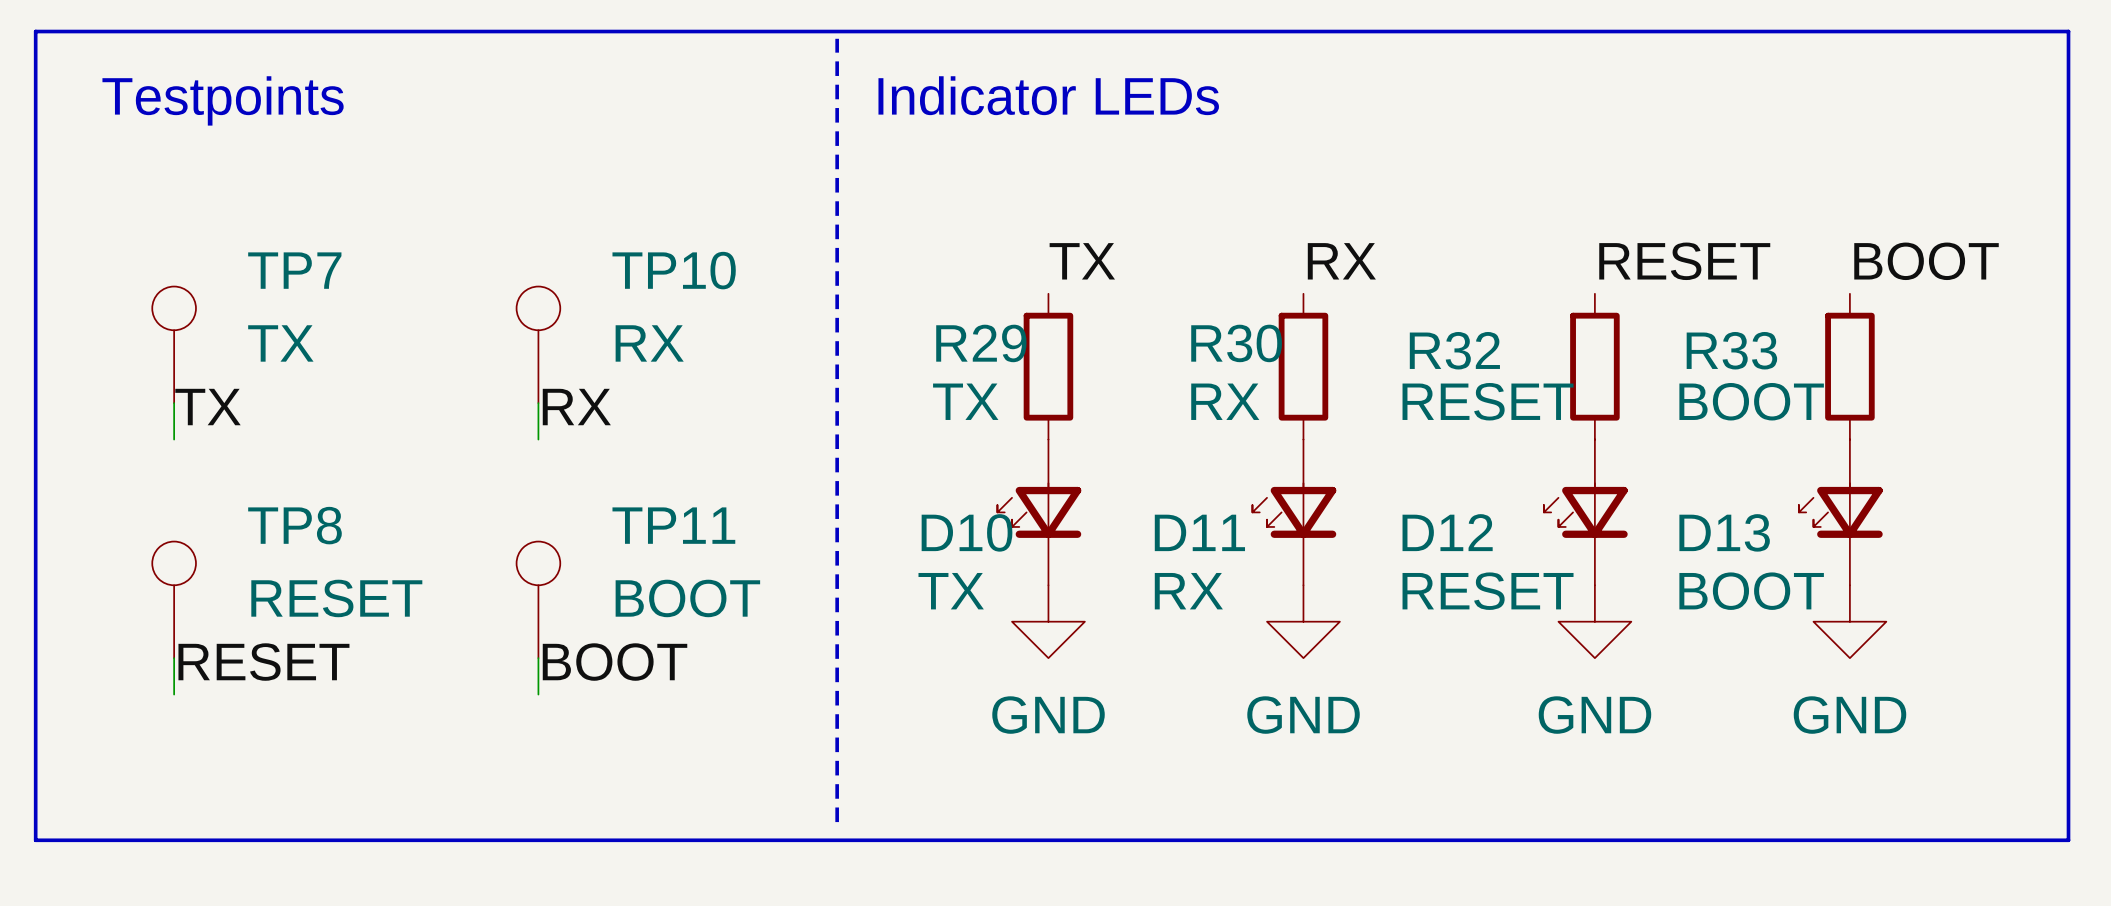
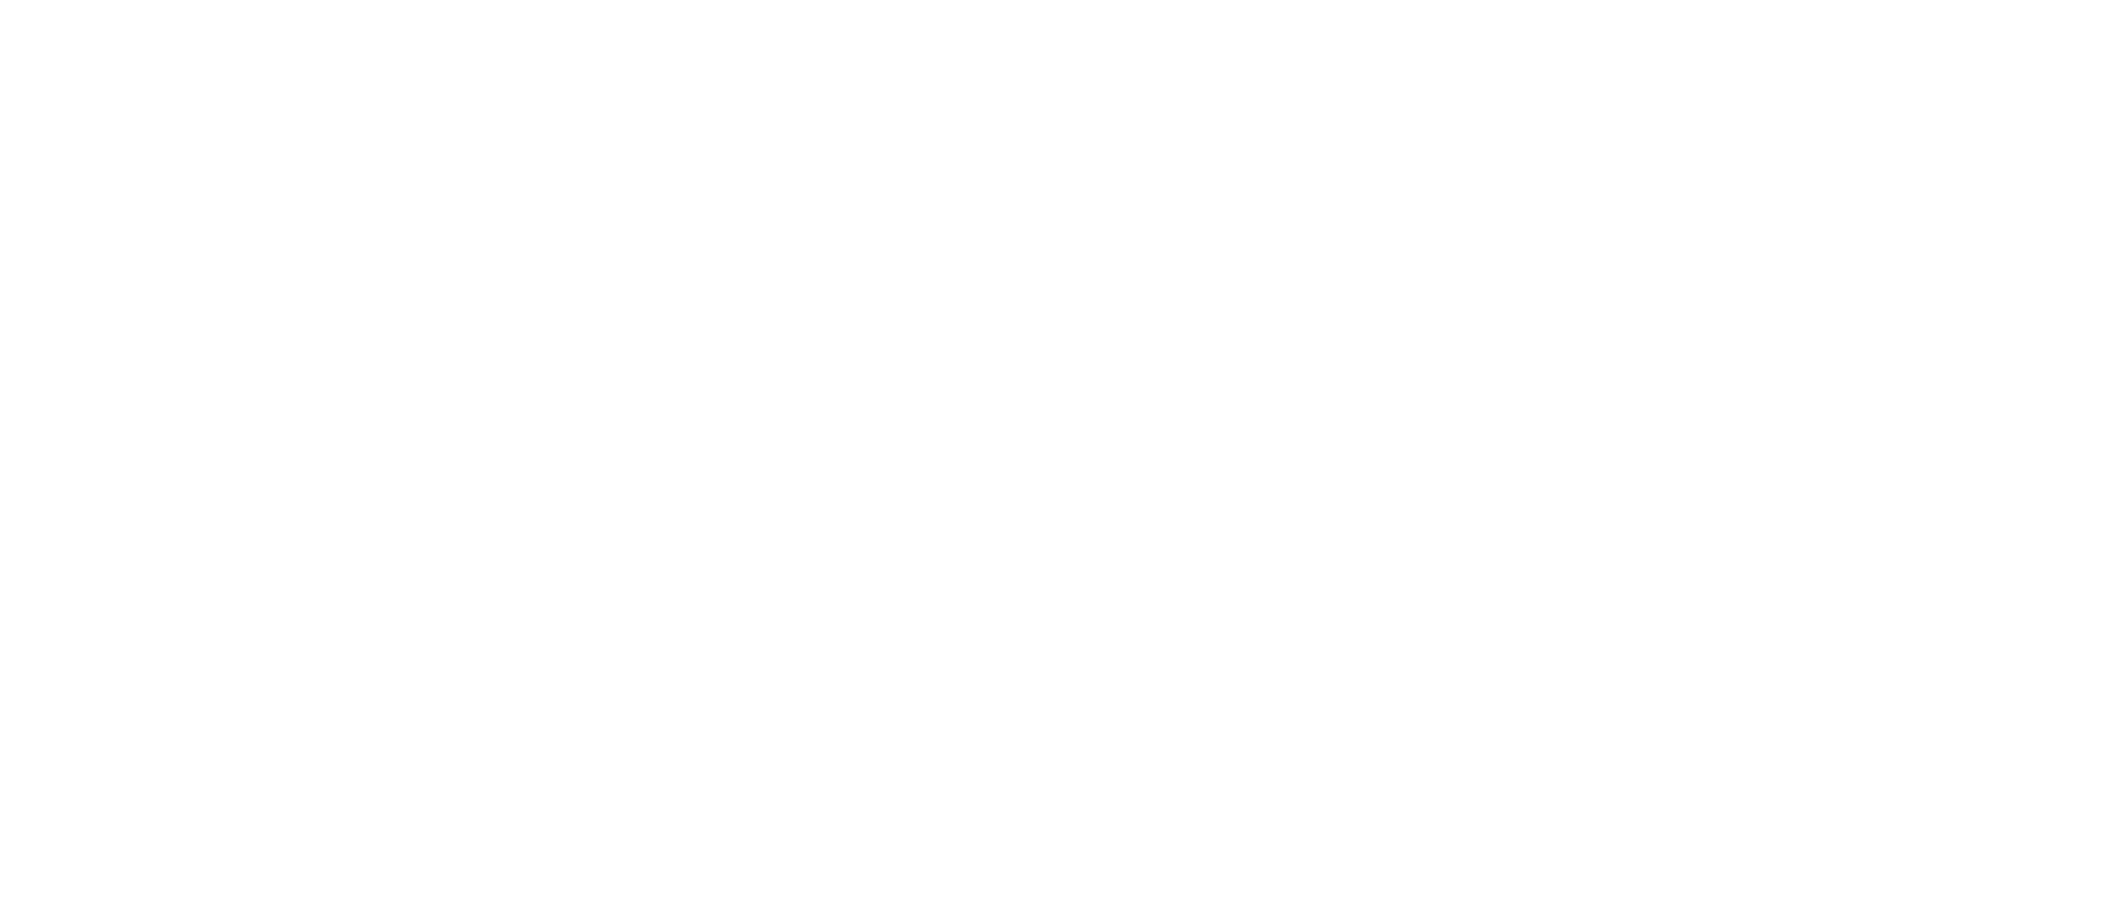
line: (35, 31) (2068, 31) (2068, 840) (35, 840) (35, 31) -> none
line: (837, 38) (837, 822) -> none
text: Indicator LEDs (1048, 95) -> none
text: Testpoints (223, 100) -> none
label: TX (1082, 261) -> none
label: RX (1341, 261) -> none
label: RESET (1684, 261) -> none
label: BOOT (1926, 261) -> none
TP7: TX (174, 344) -> none
TP10: RX (538, 344) -> none
R29: TX (1048, 366) -> none
R30: RX (1303, 366) -> none
R32: RESET (1594, 366) -> none
R33: BOOT (1849, 366) -> none
wire: (174, 403) (174, 439) -> none
wire: (538, 403) (538, 439) -> none
label: TX (207, 407) -> none
label: RX (576, 407) -> none
D10: TX (1039, 512) -> none
D11: RX (1294, 512) -> none
D12: RESET (1585, 512) -> none
D13: BOOT (1840, 512) -> none
TP8: RESET (174, 599) -> none
TP11: BOOT (538, 599) -> none
power symbol: GND (1048, 621) -> none
power symbol: GND (1303, 621) -> none
power symbol: GND (1594, 621) -> none
power symbol: GND (1849, 621) -> none
wire: (174, 658) (174, 694) -> none
wire: (538, 658) (538, 694) -> none
label: RESET (263, 662) -> none
label: BOOT (615, 662) -> none

